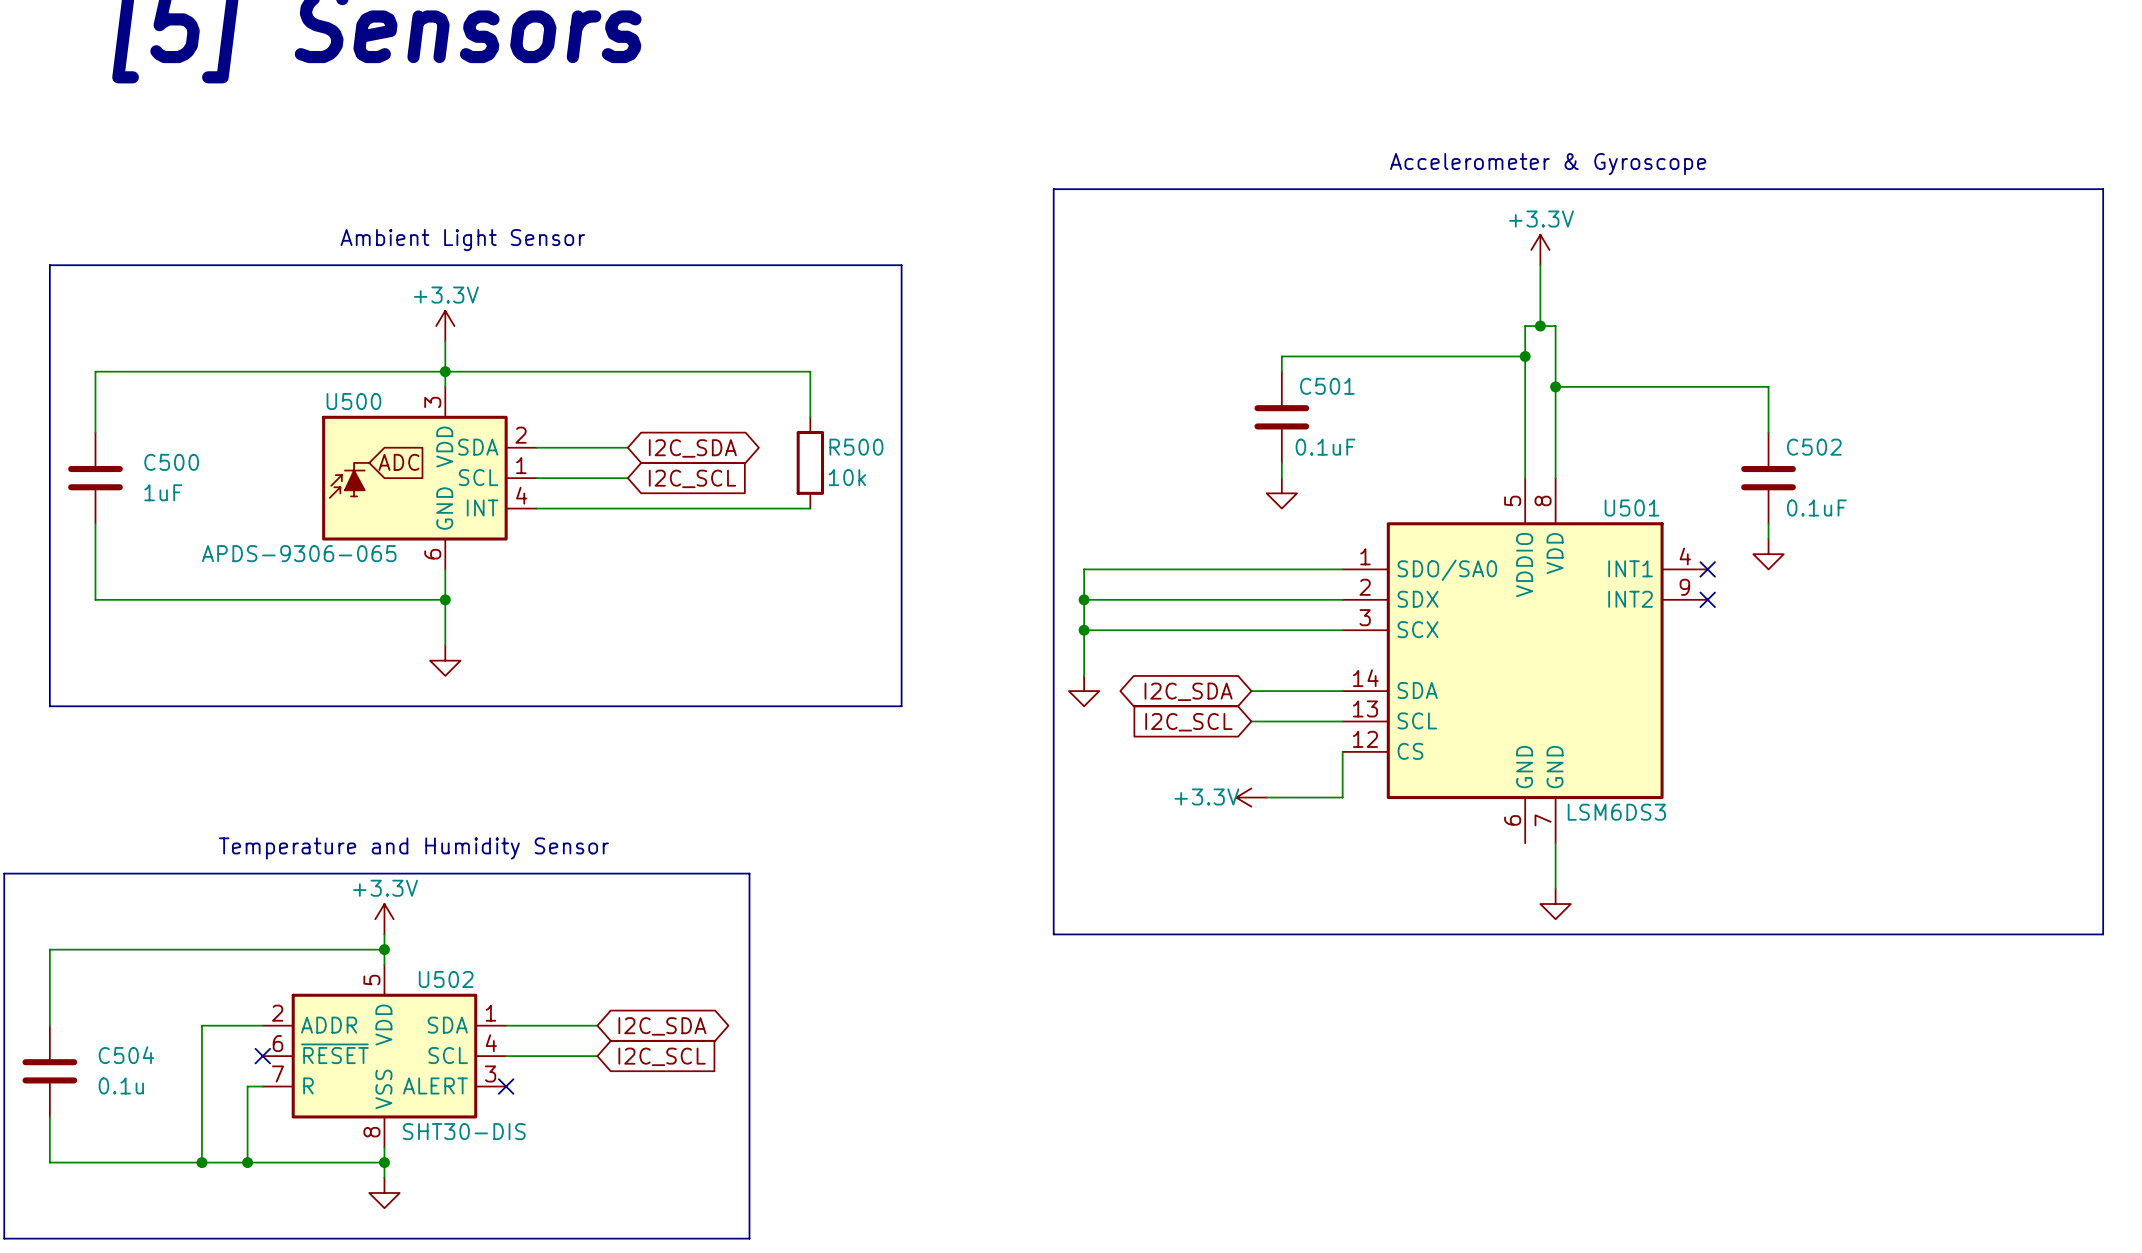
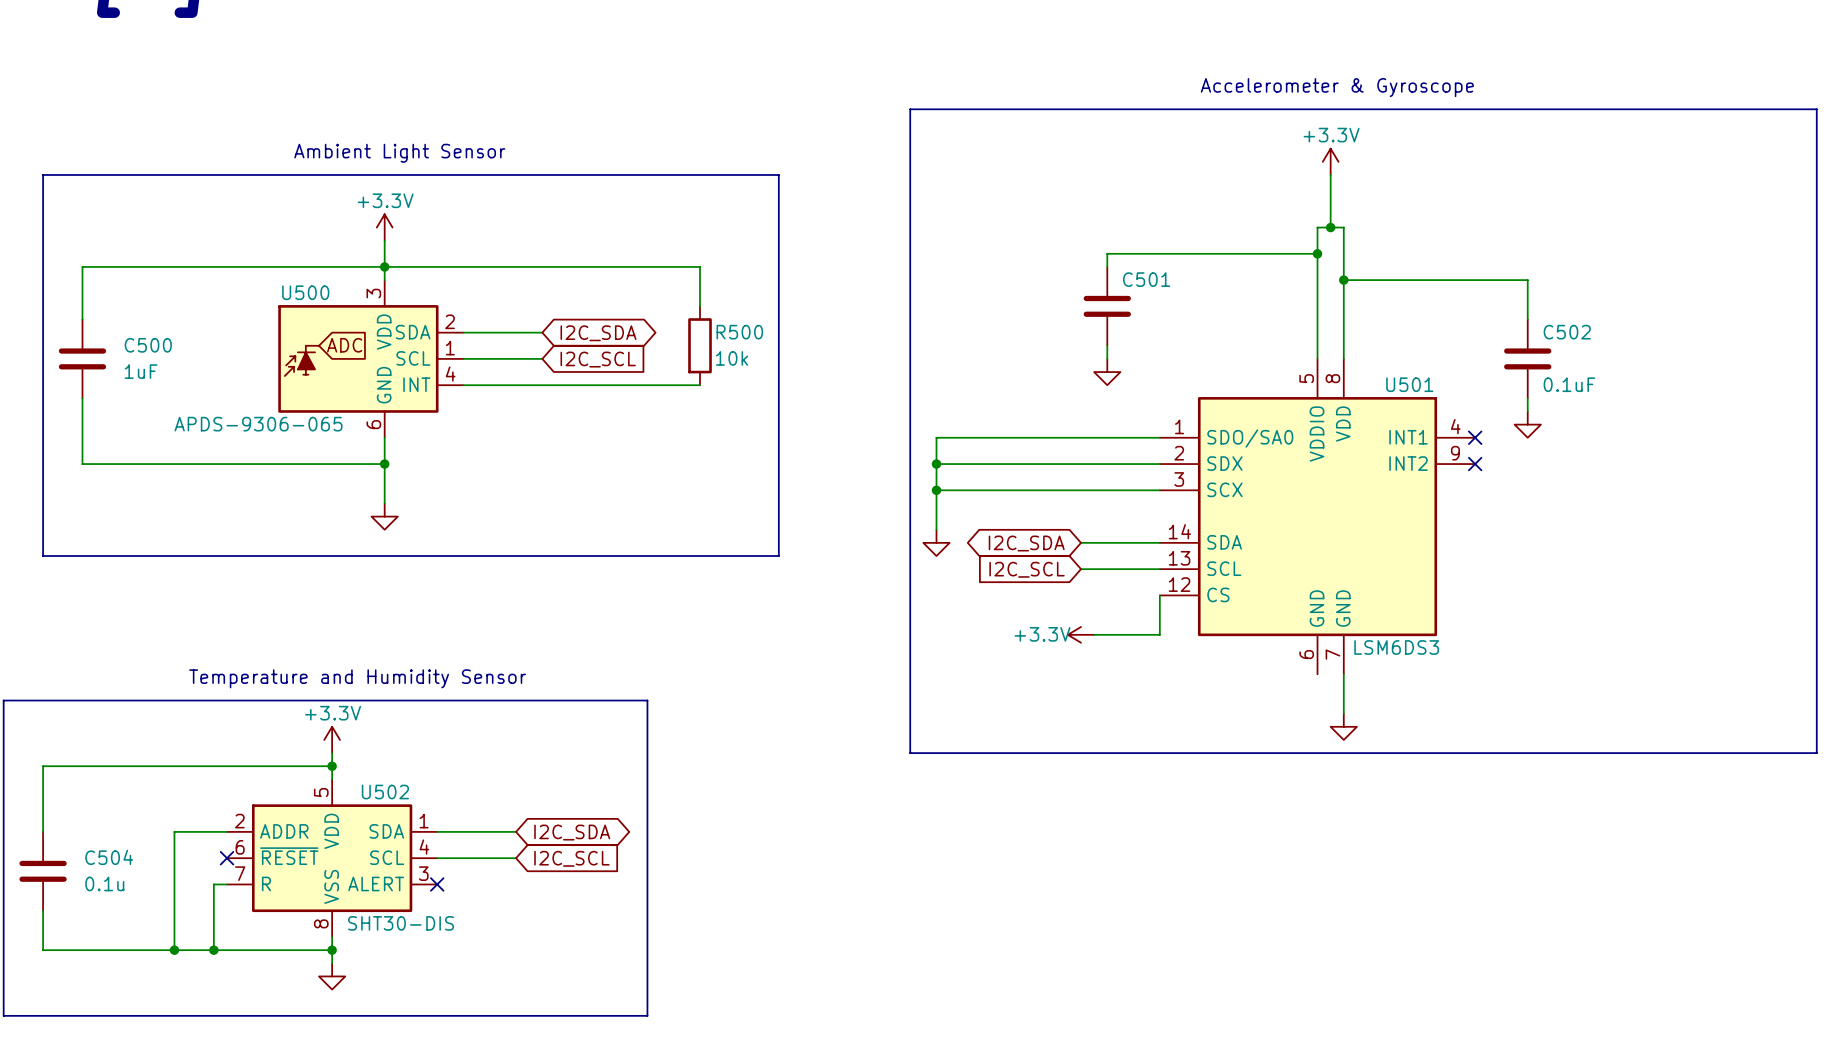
C501 value: 0.1uF (1325, 447) -> none

